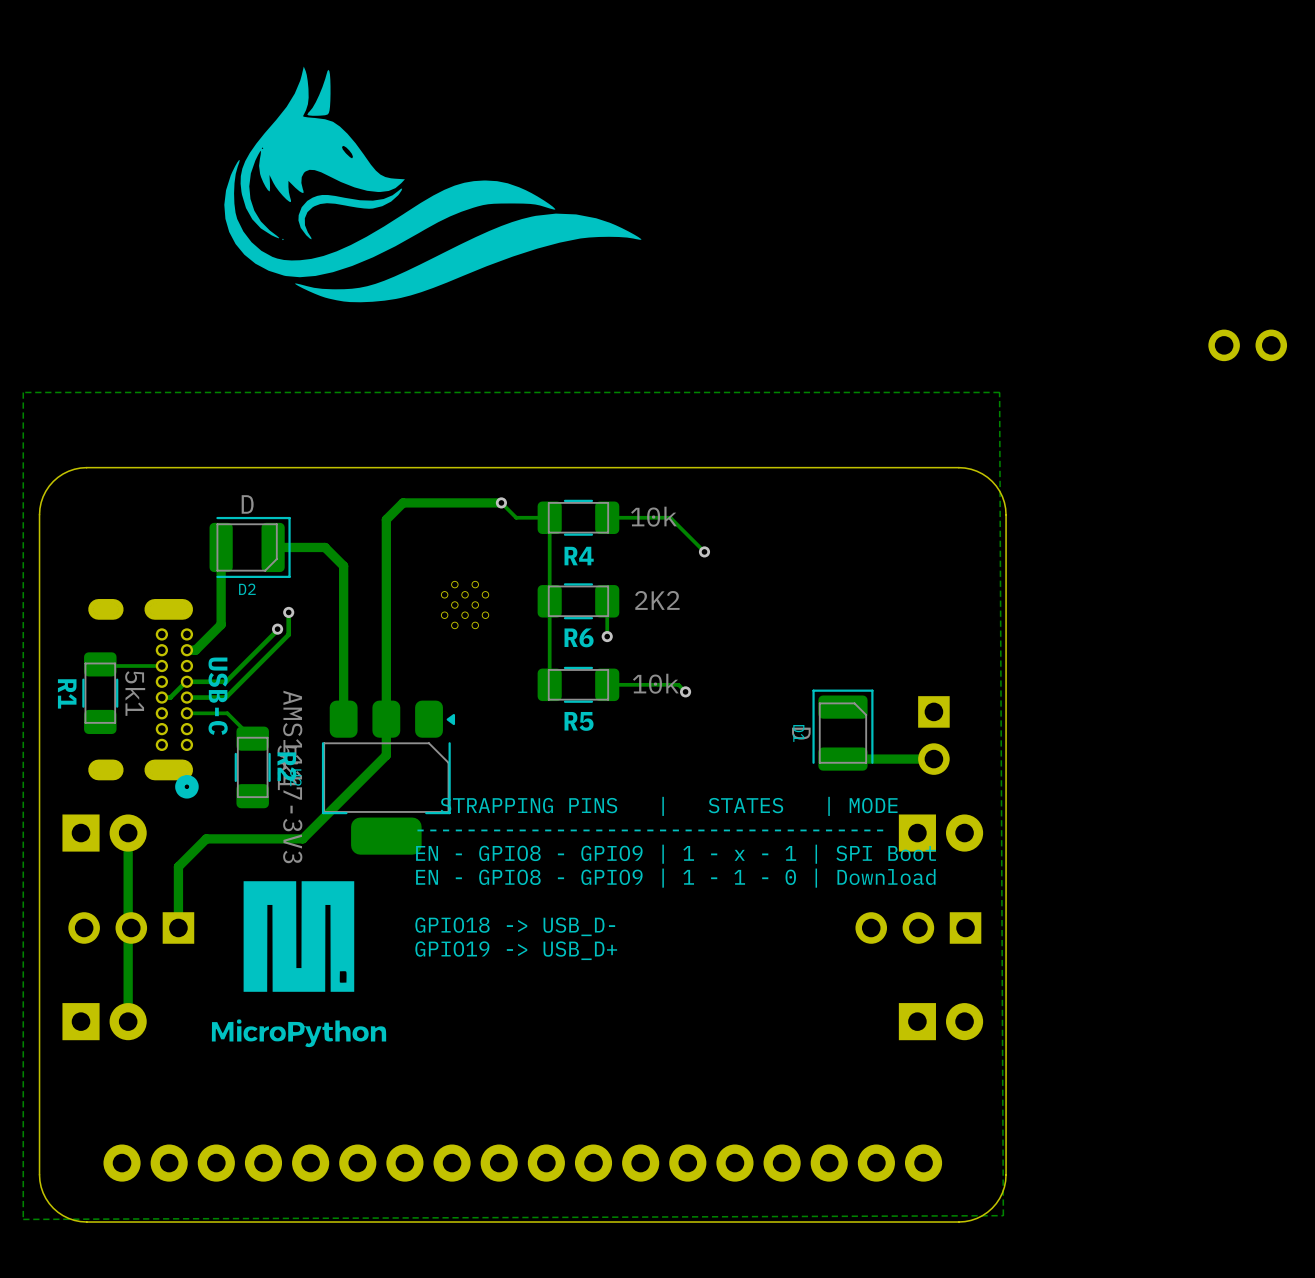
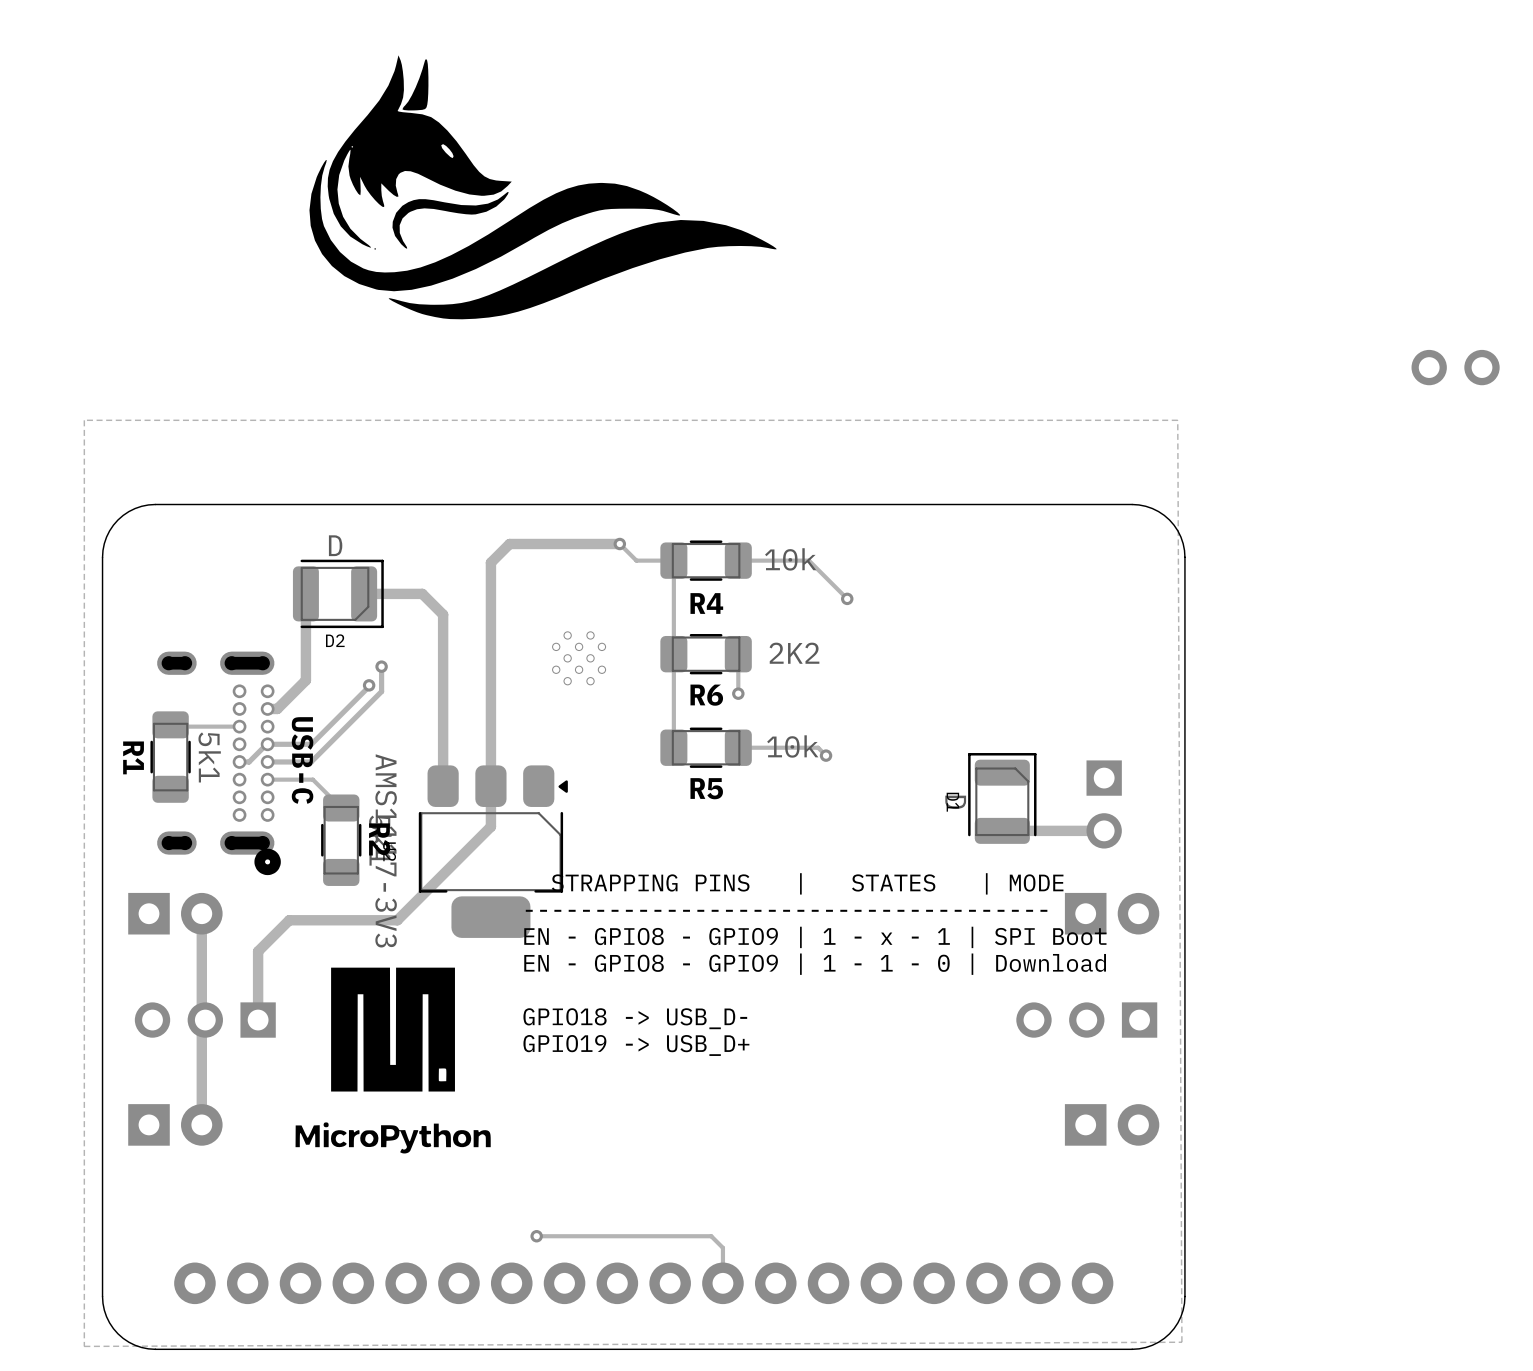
track: none -> (536, 1236) (711, 1236) (722, 1247) (722, 1283)
via: none -> (536, 1236)

